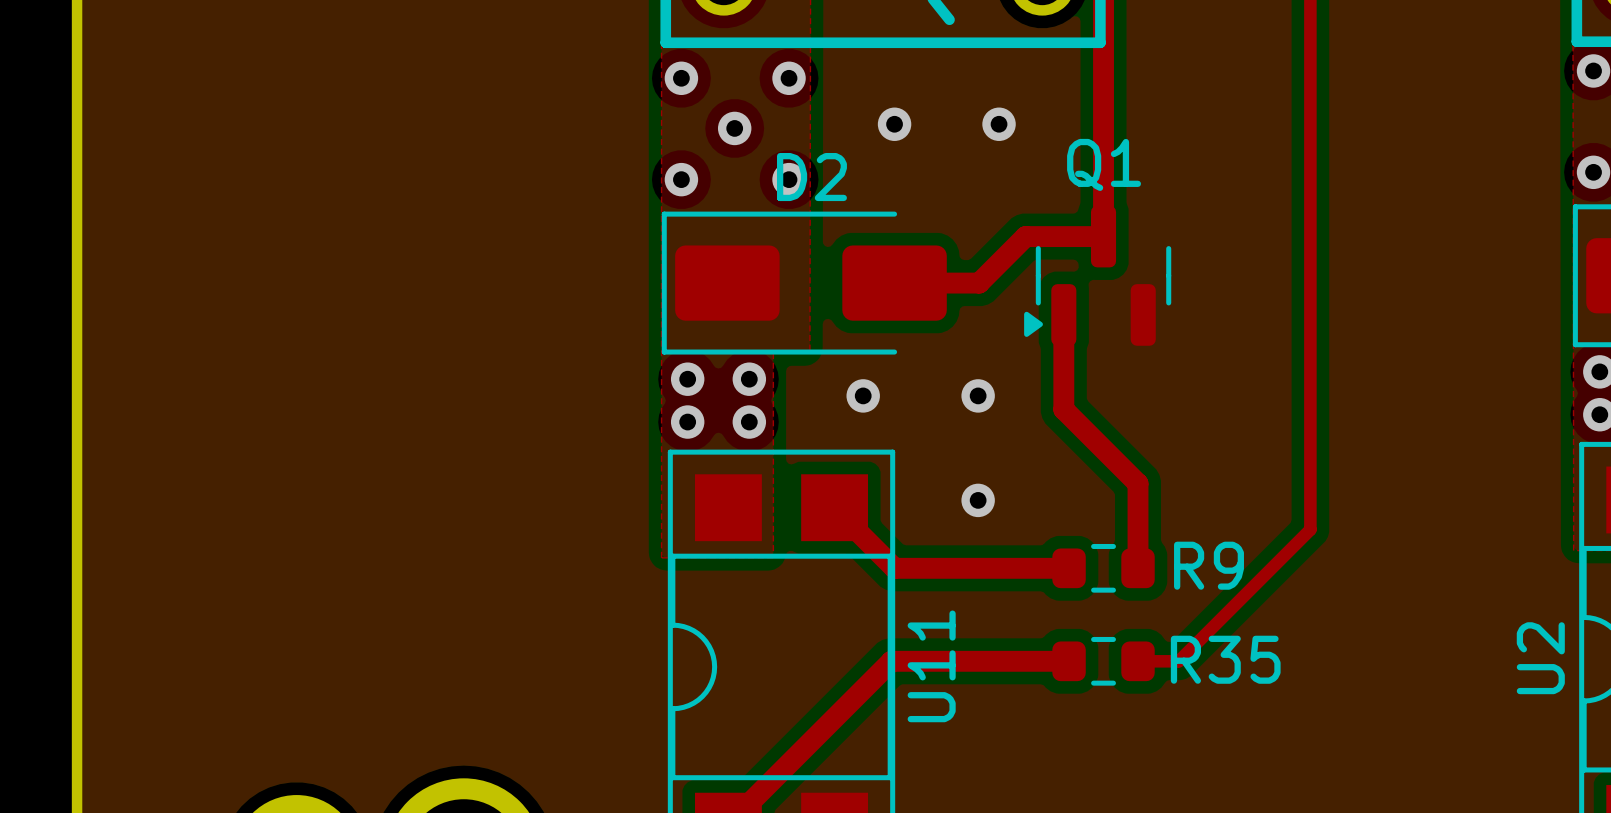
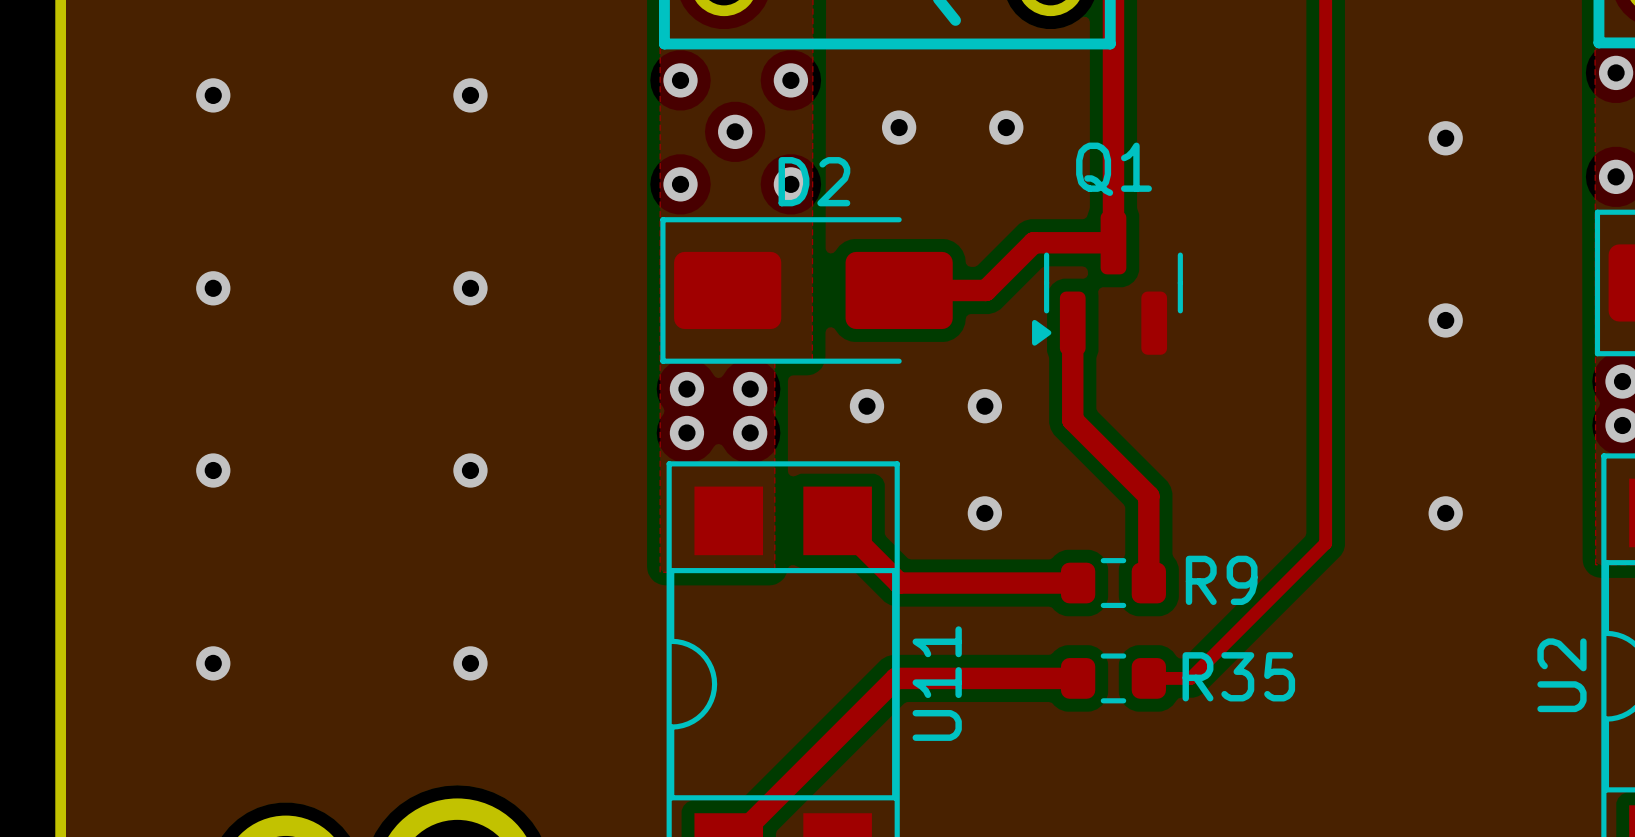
via: none -> (213, 95)
via: none -> (470, 95)
via: none -> (1445, 138)
via: none -> (213, 288)
via: none -> (470, 288)
via: none -> (1445, 320)
via: none -> (213, 470)
via: none -> (470, 470)
via: none -> (1445, 513)
via: none -> (213, 663)
via: none -> (470, 663)

